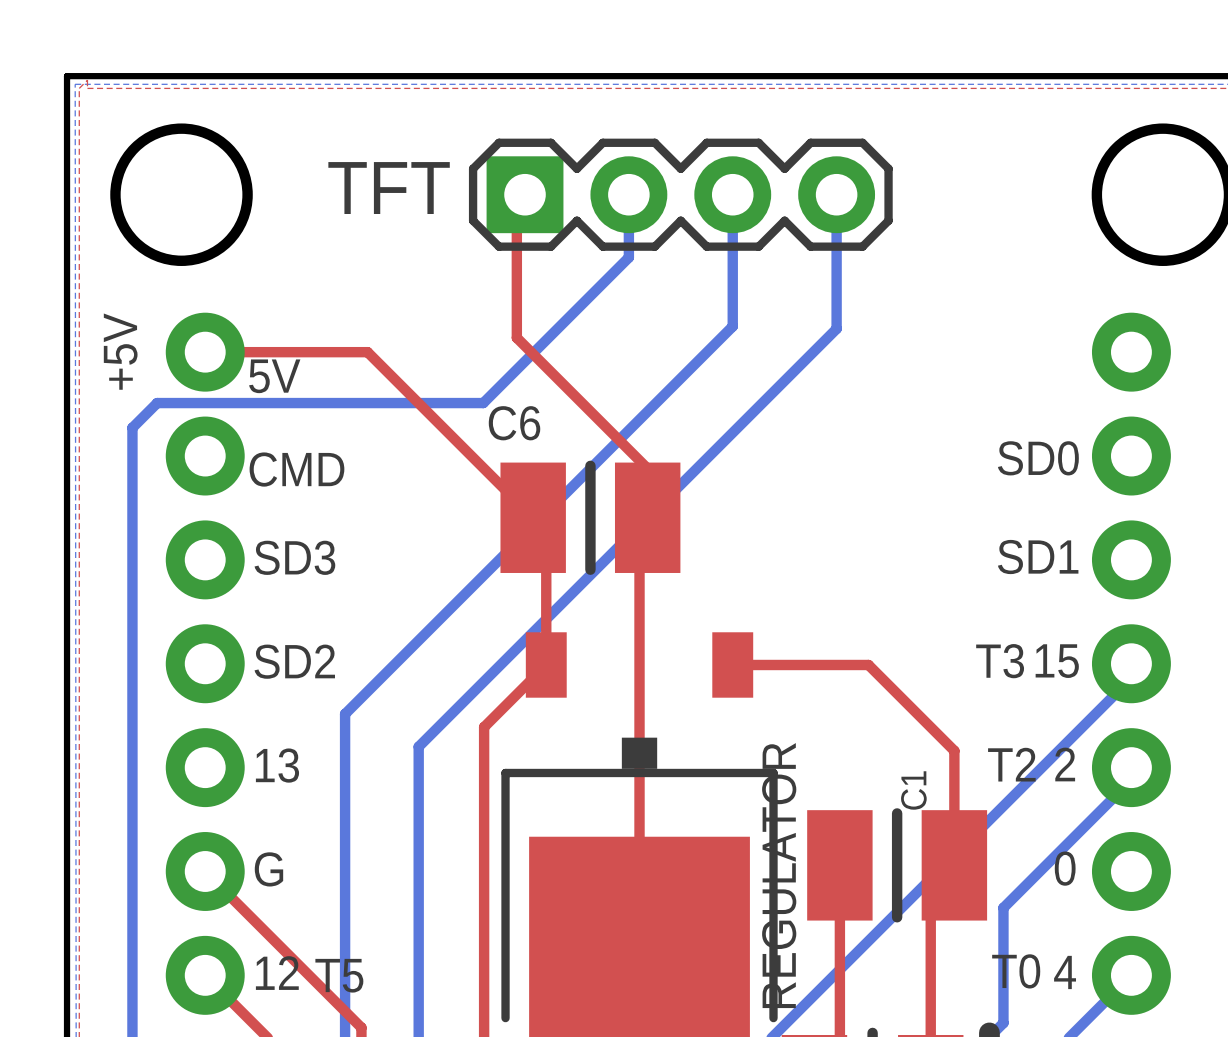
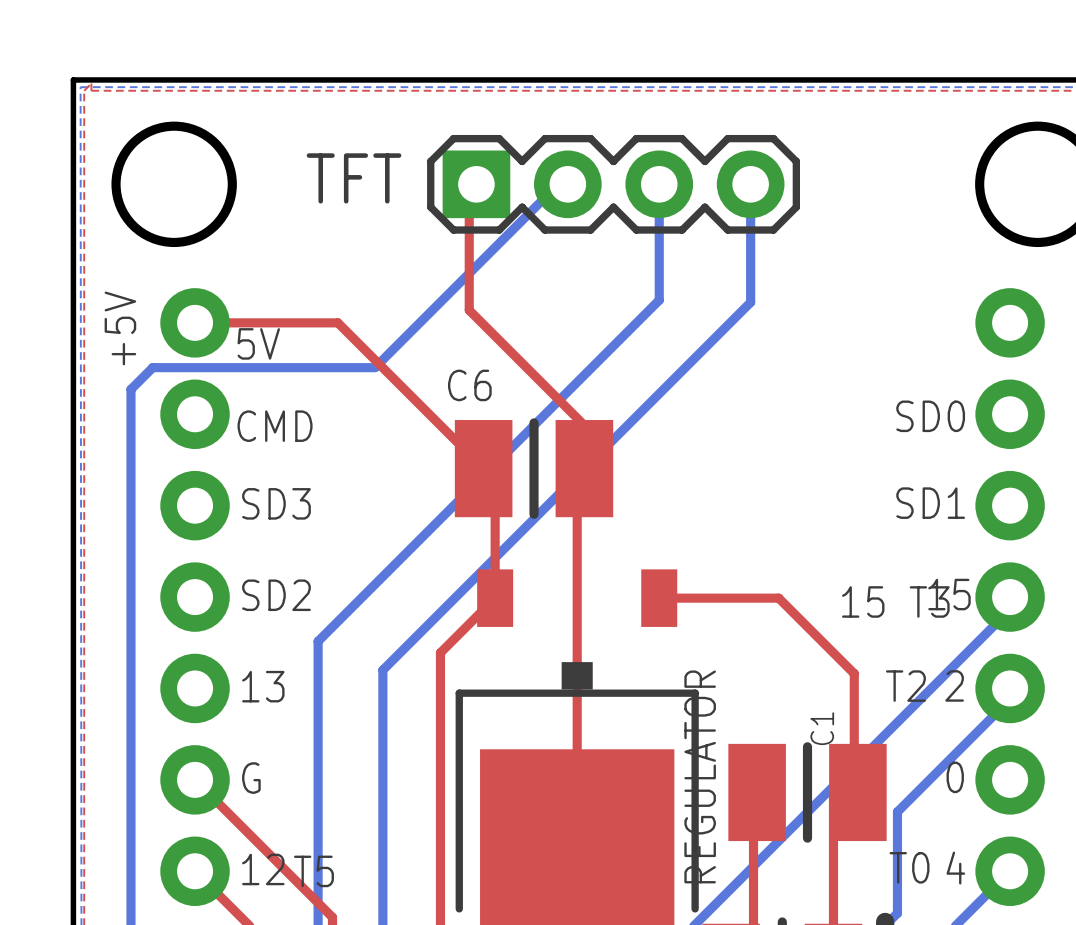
bottom track: (628, 194) (628, 257) (483, 403) (409, 403) -> (567, 184) (558, 184) (374, 367)
text: T3 (1000, 661) -> none
text: none -> 15 T3 (895, 601)
C1 position: (897, 865) -> (807, 792)

